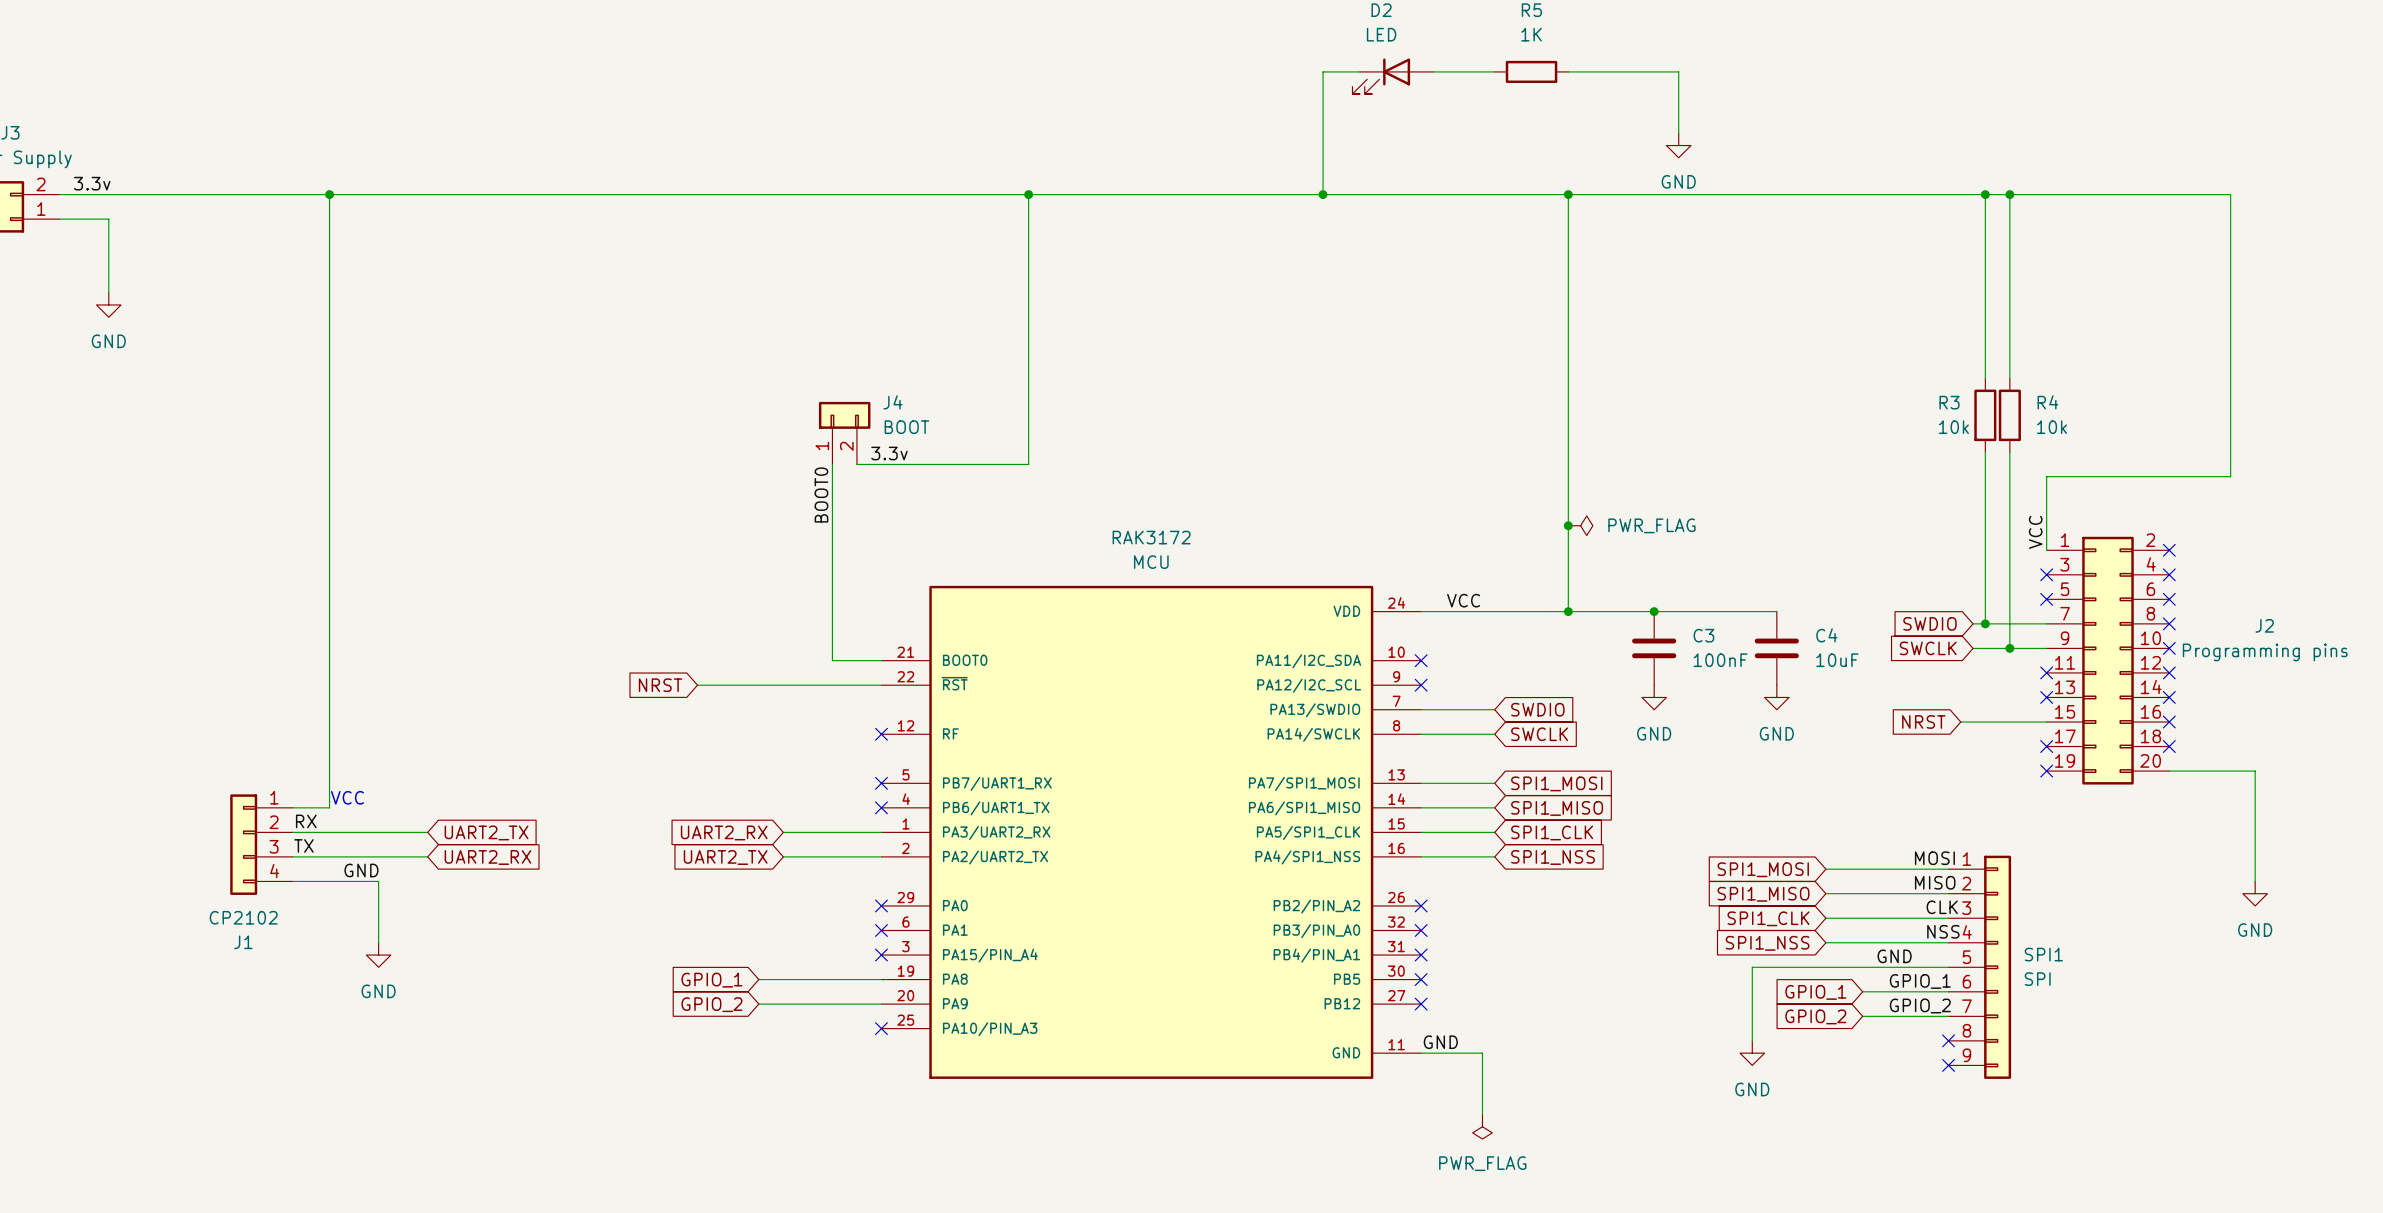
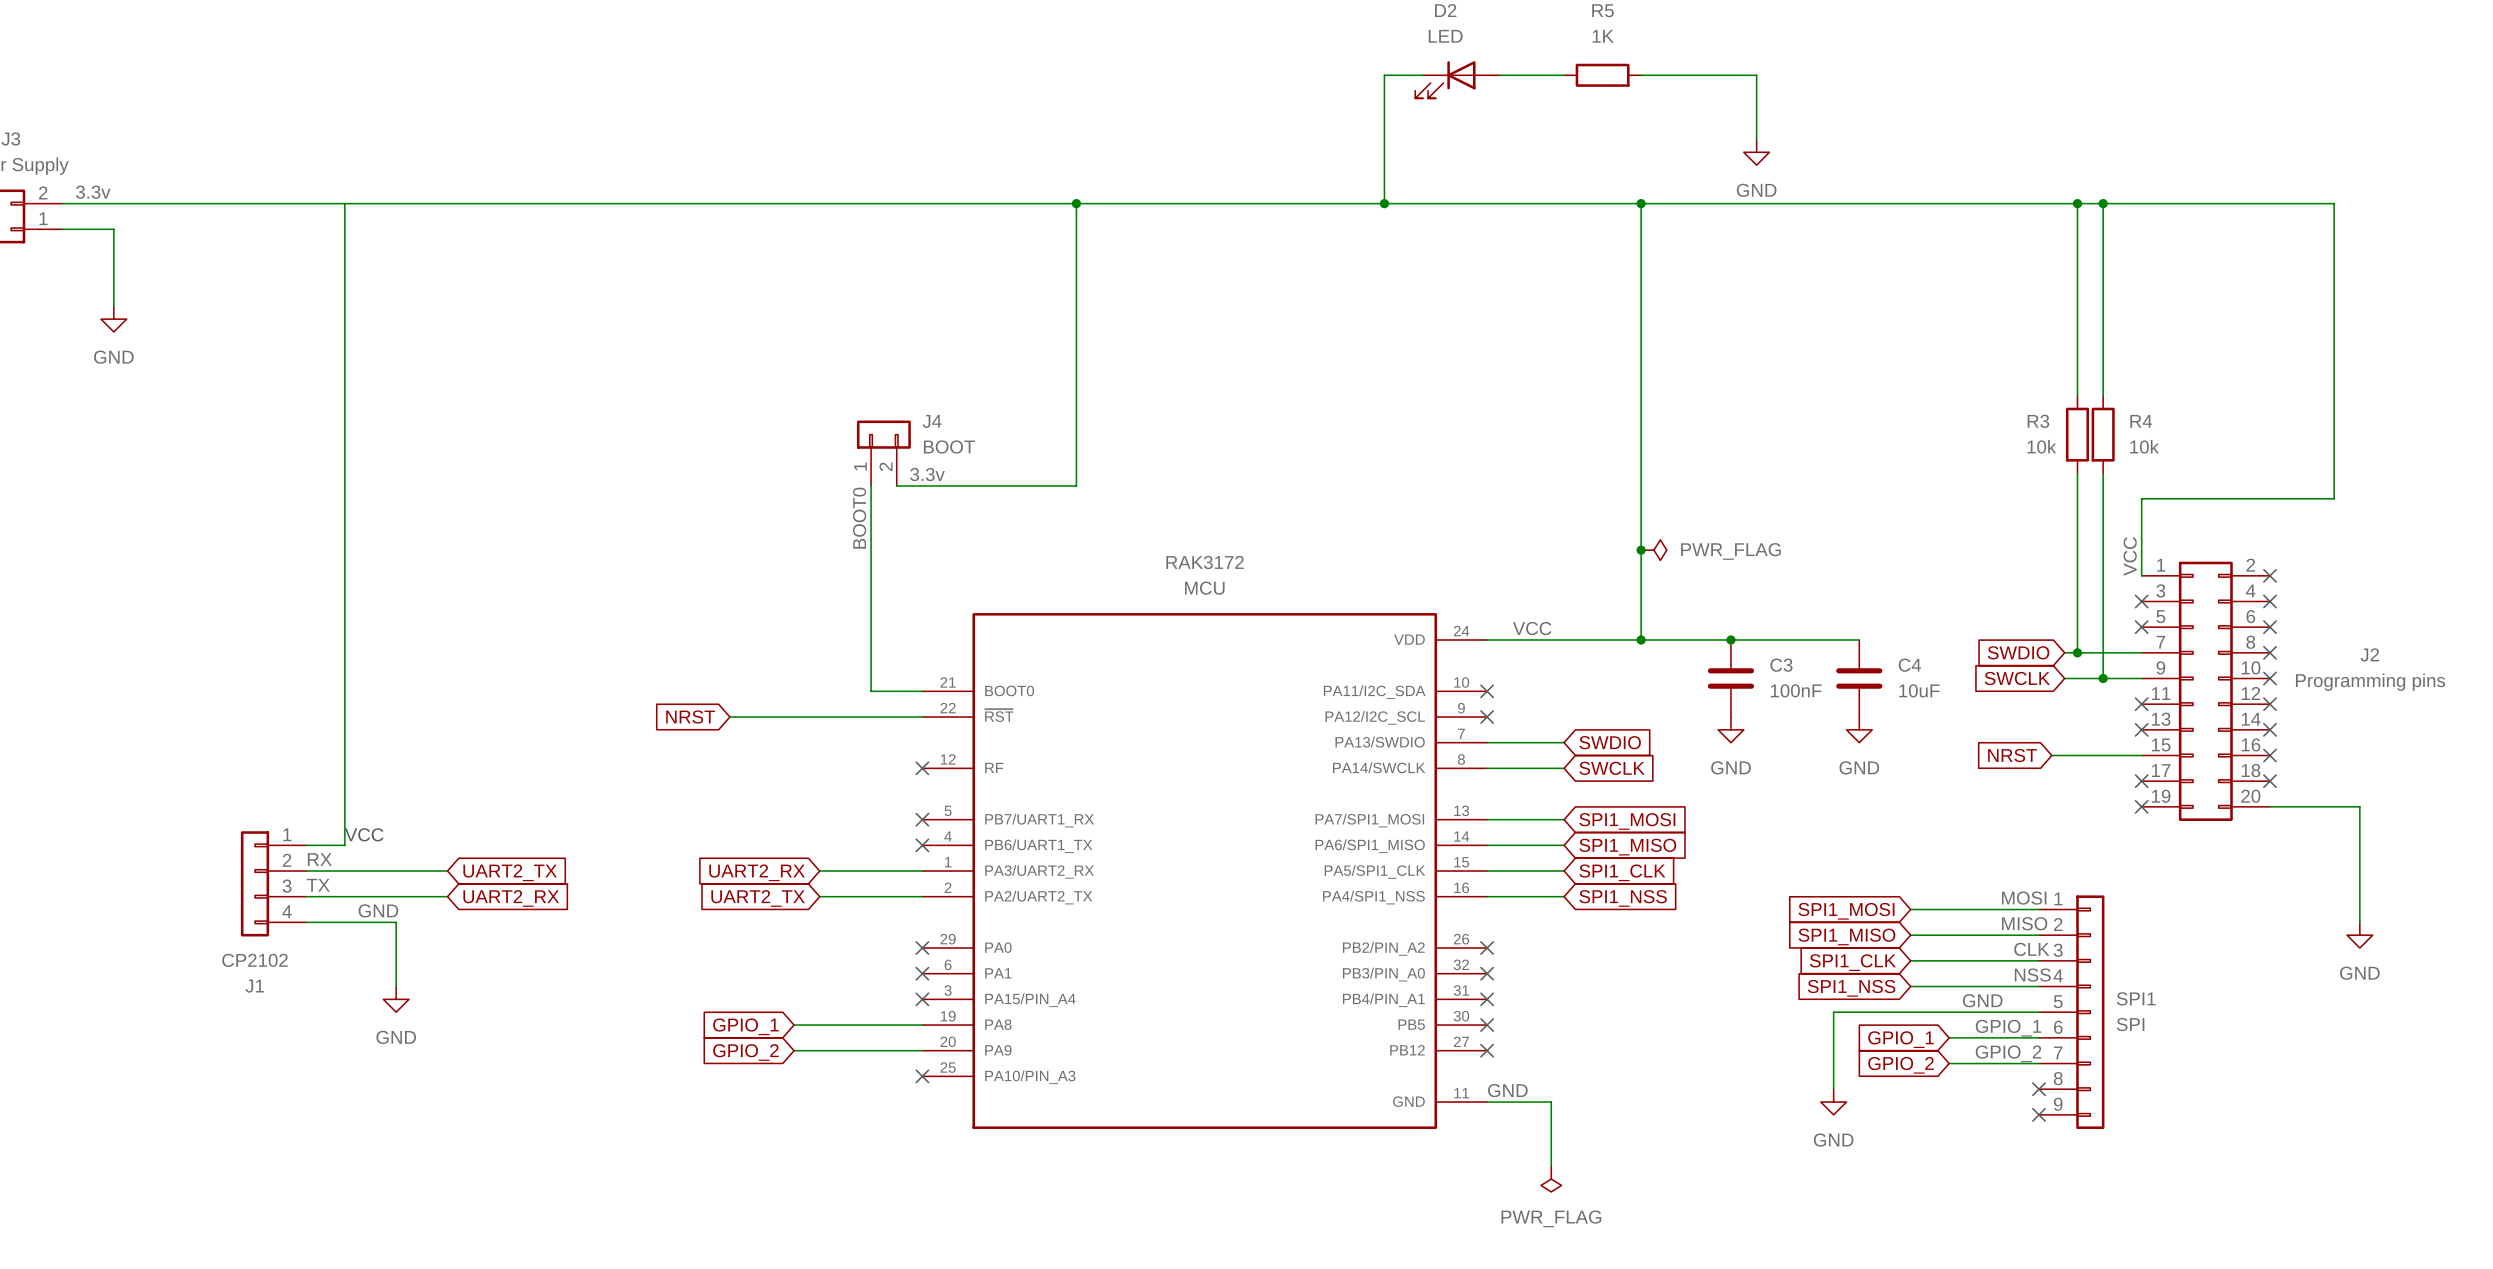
junction: (329, 194) -> none

